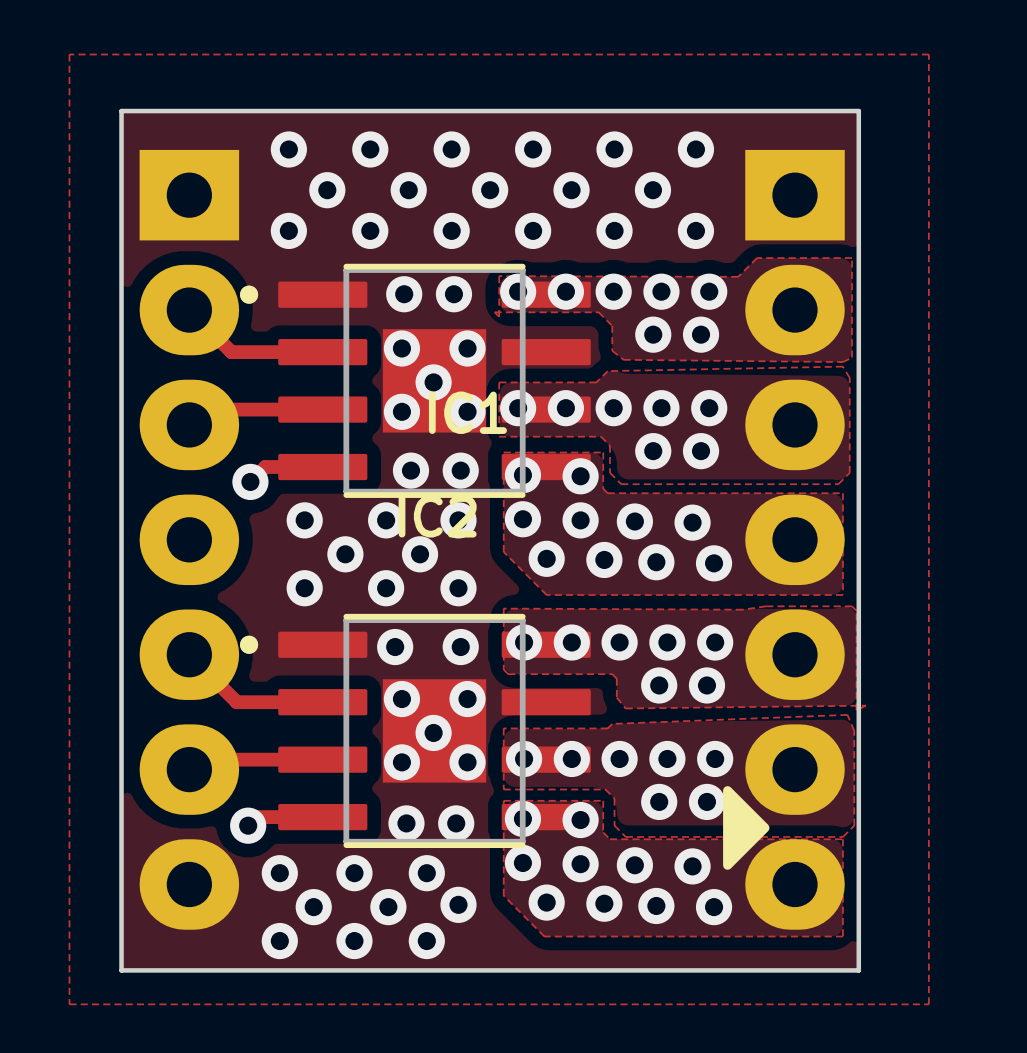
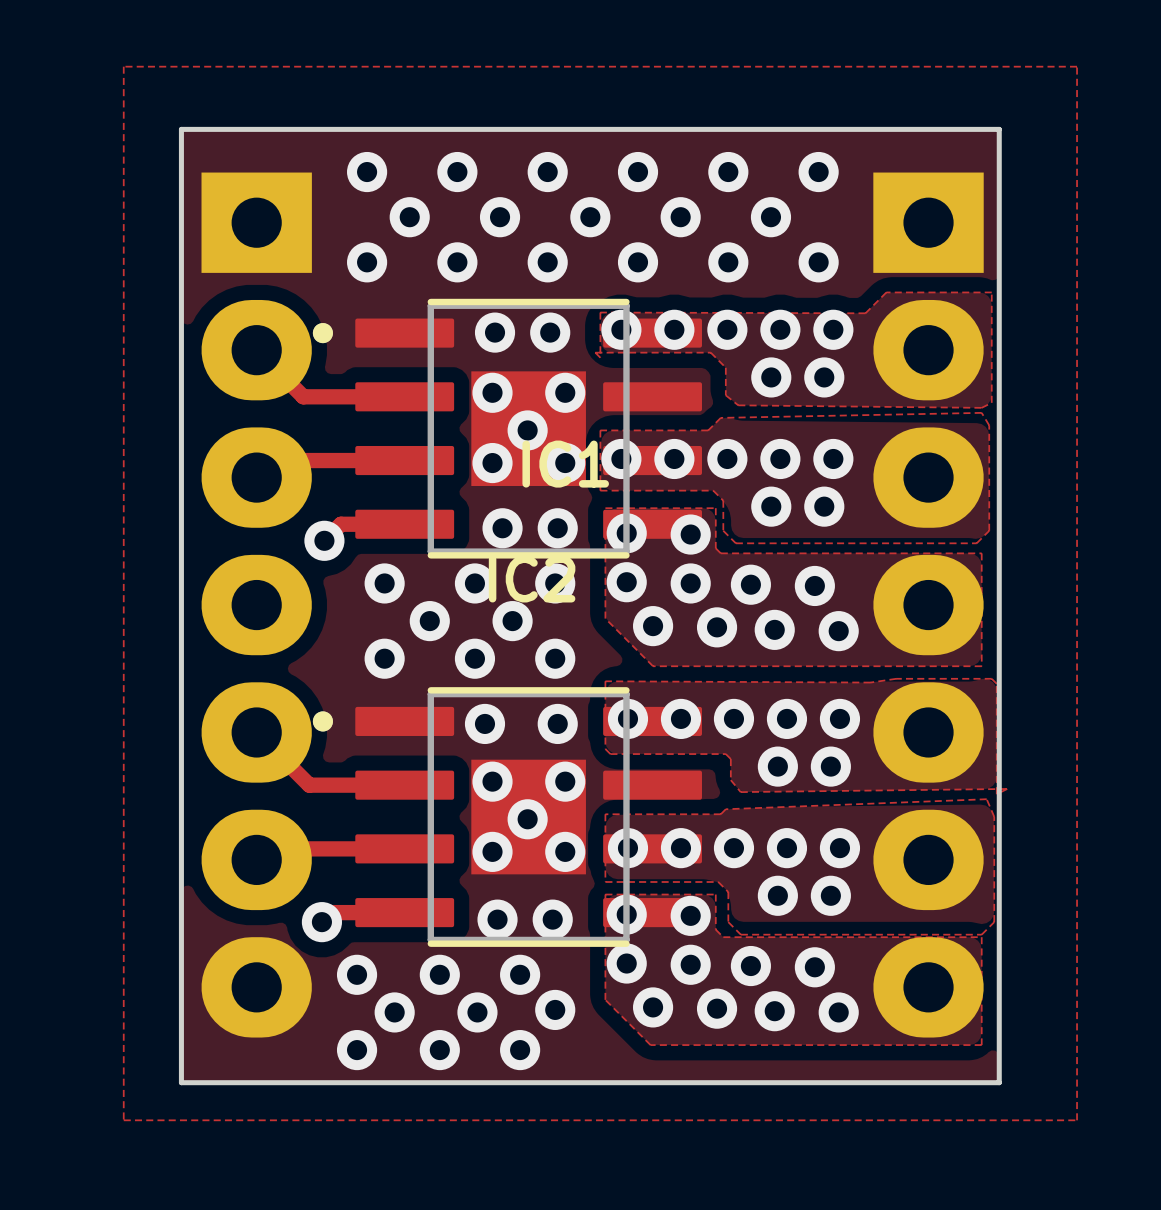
drawing: [723, 786, 770, 870] -> none

